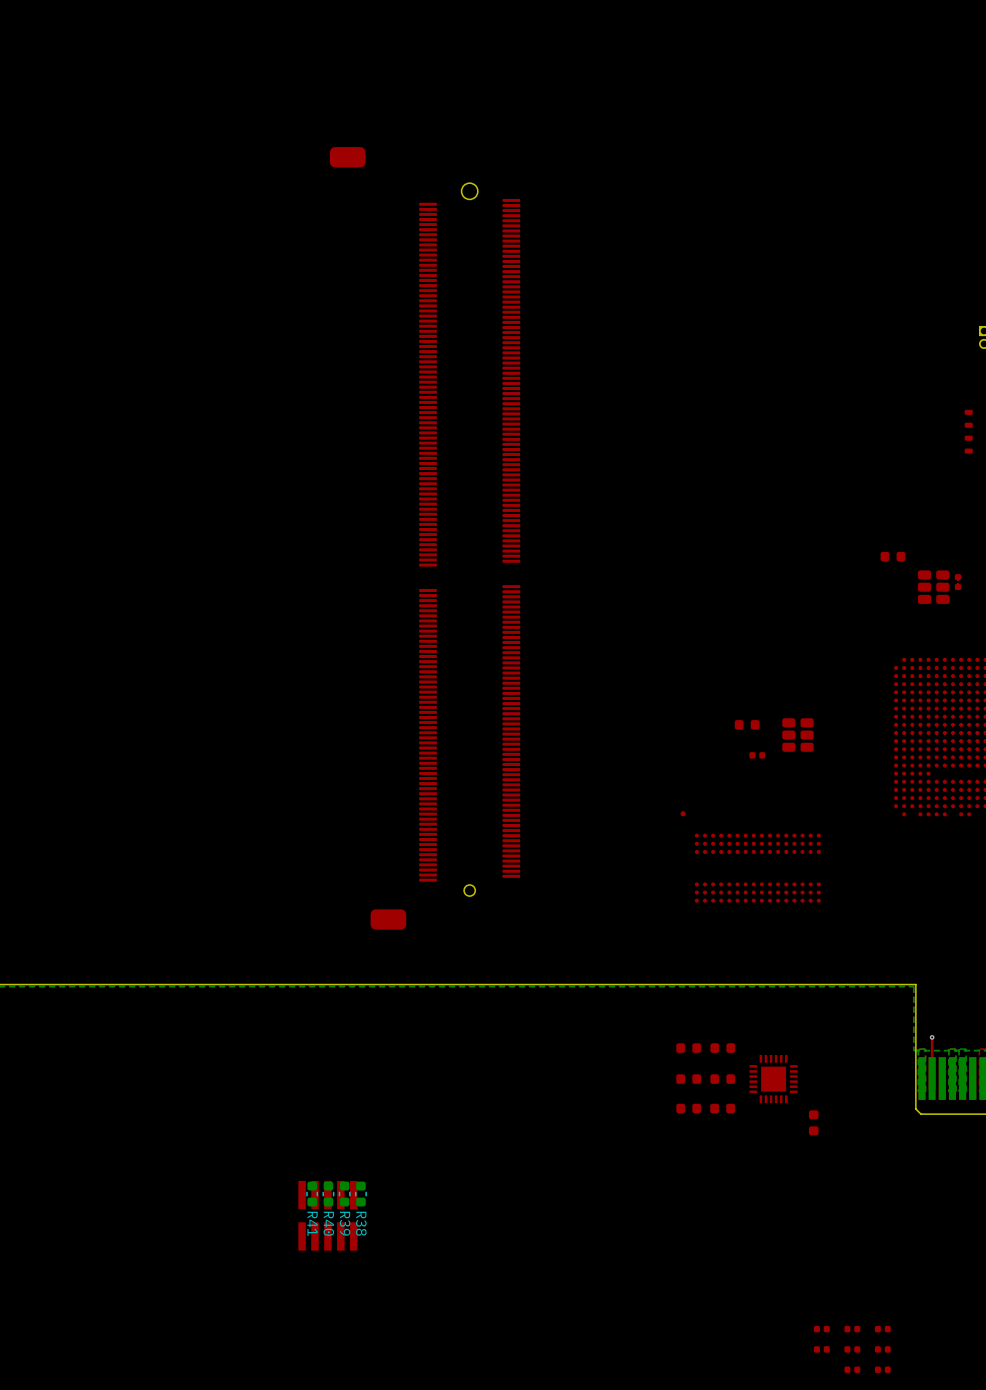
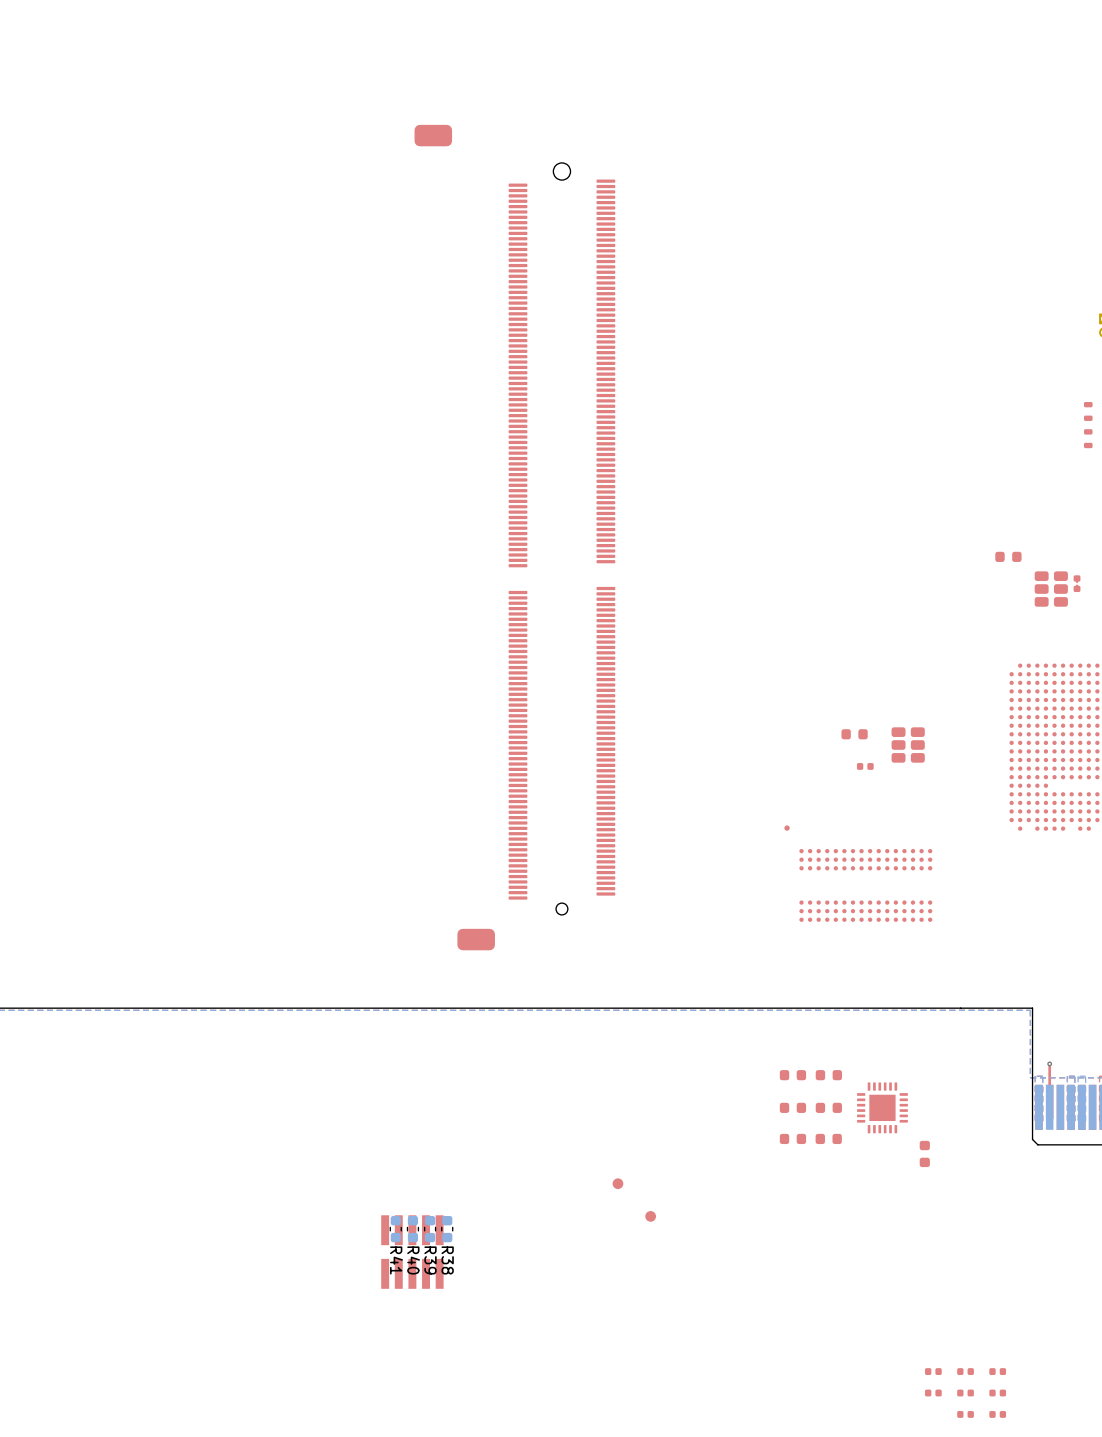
part: none -> (617, 1183)
part: none -> (650, 1216)

